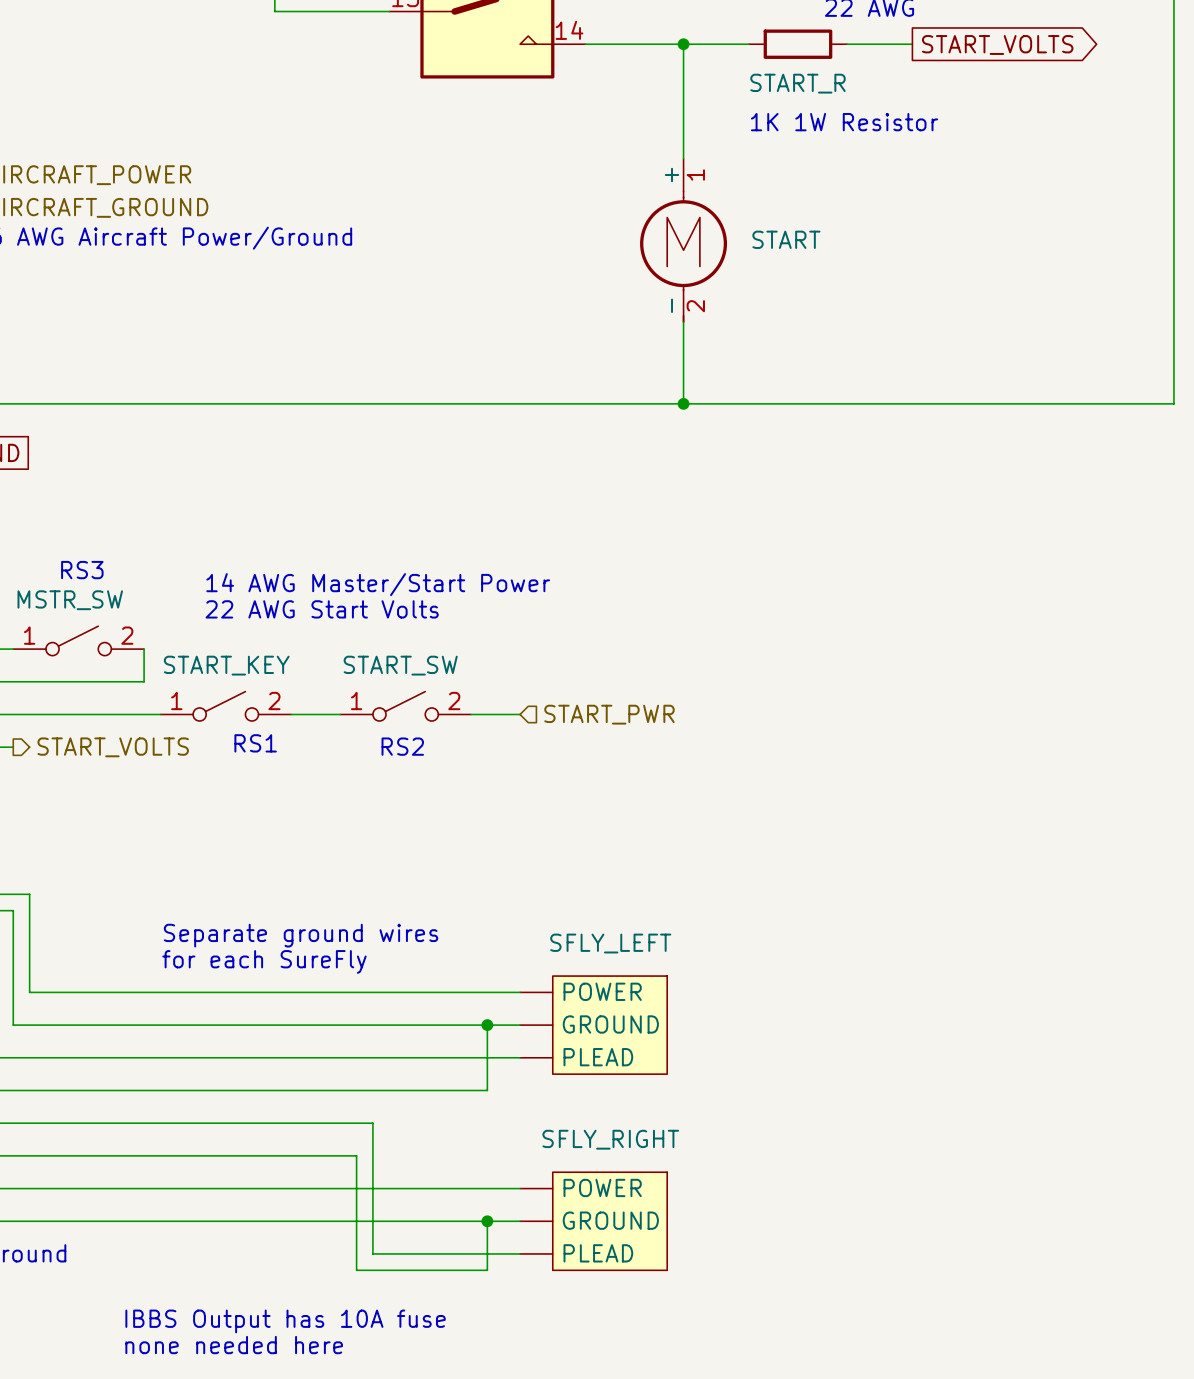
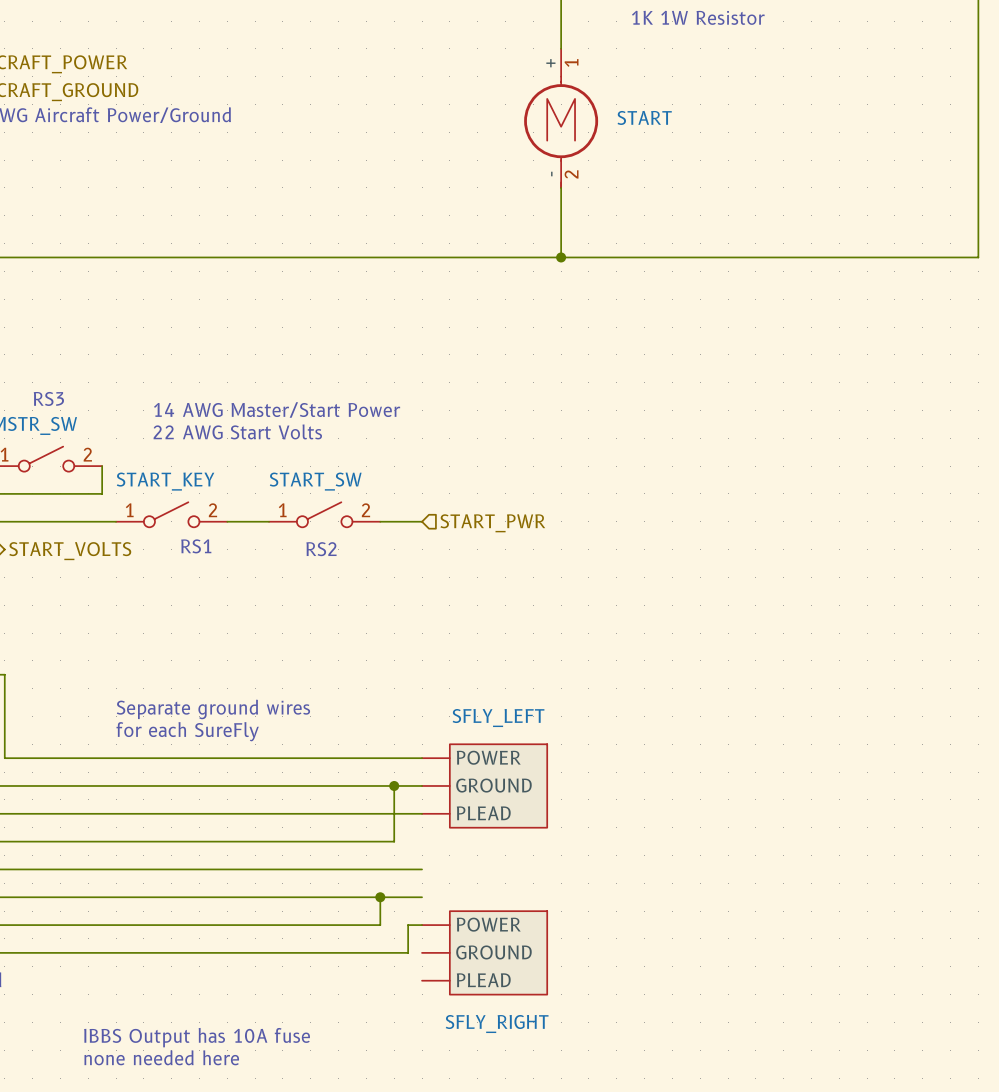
wire: (372, 1123) (372, 1253) (520, 1253) -> (296, 869) (422, 869)
SFLY_RIGHT name position: SFLY_RIGHT (610, 1139) -> SFLY_RIGHT (497, 1024)
wire: (356, 1155) (356, 1270) (487, 1270) (487, 1221) -> (282, 897) (422, 897)
wire: (471, 1188) (503, 1188) -> (380, 925) (380, 897)
junction position: (487, 1221) -> (380, 897)
wire: (503, 1221) (520, 1221) -> (408, 952) (408, 925)

